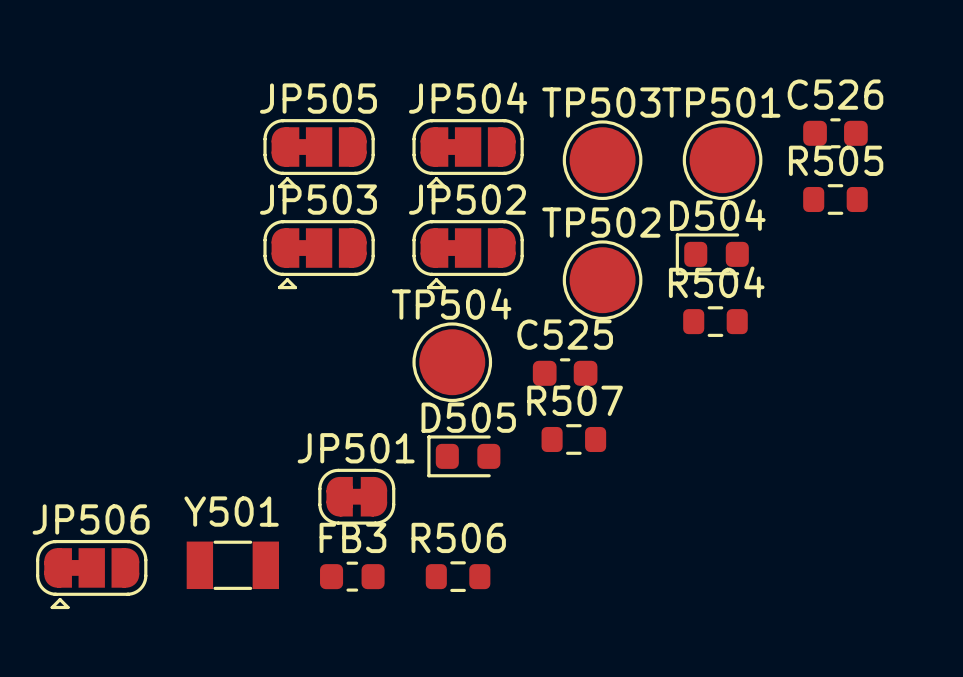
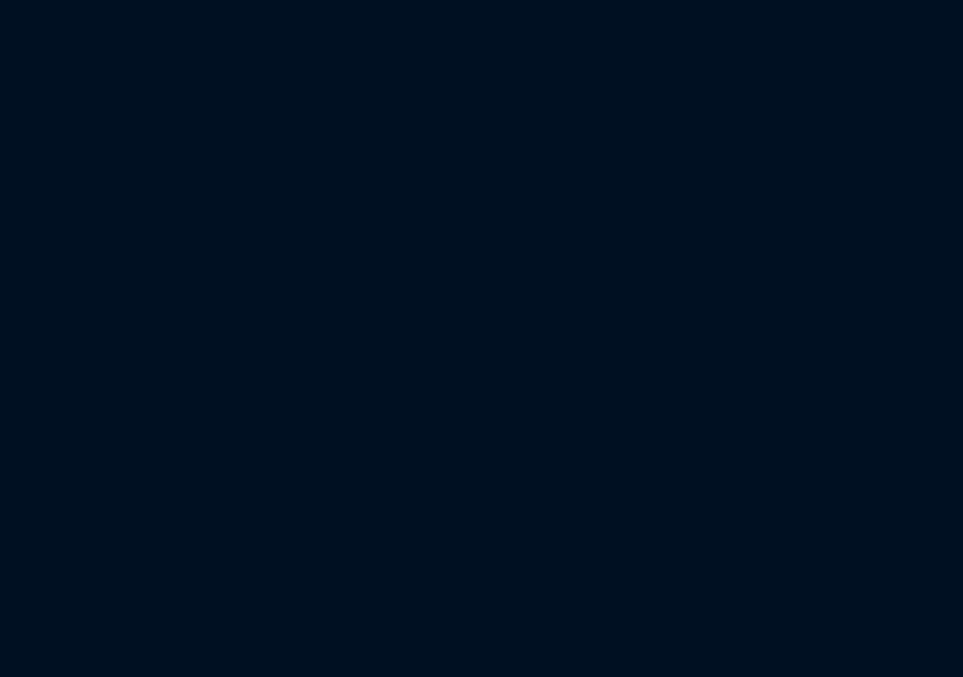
C526: (835, 133) -> none
JP505: (319, 153) -> none
JP504: (468, 153) -> none
TP503: (602, 160) -> none
TP501: (722, 160) -> none
R505: (835, 199) -> none
JP503: (319, 254) -> none
JP502: (468, 254) -> none
D504: (712, 254) -> none
TP502: (602, 280) -> none
R504: (715, 321) -> none
TP504: (452, 362) -> none
C525: (565, 373) -> none
R507: (573, 439) -> none
D505: (463, 456) -> none
JP501: (356, 496) -> none
Y501: (232, 565) -> none
JP506: (91, 574) -> none
FB3: (352, 576) -> none
R506: (458, 576) -> none

